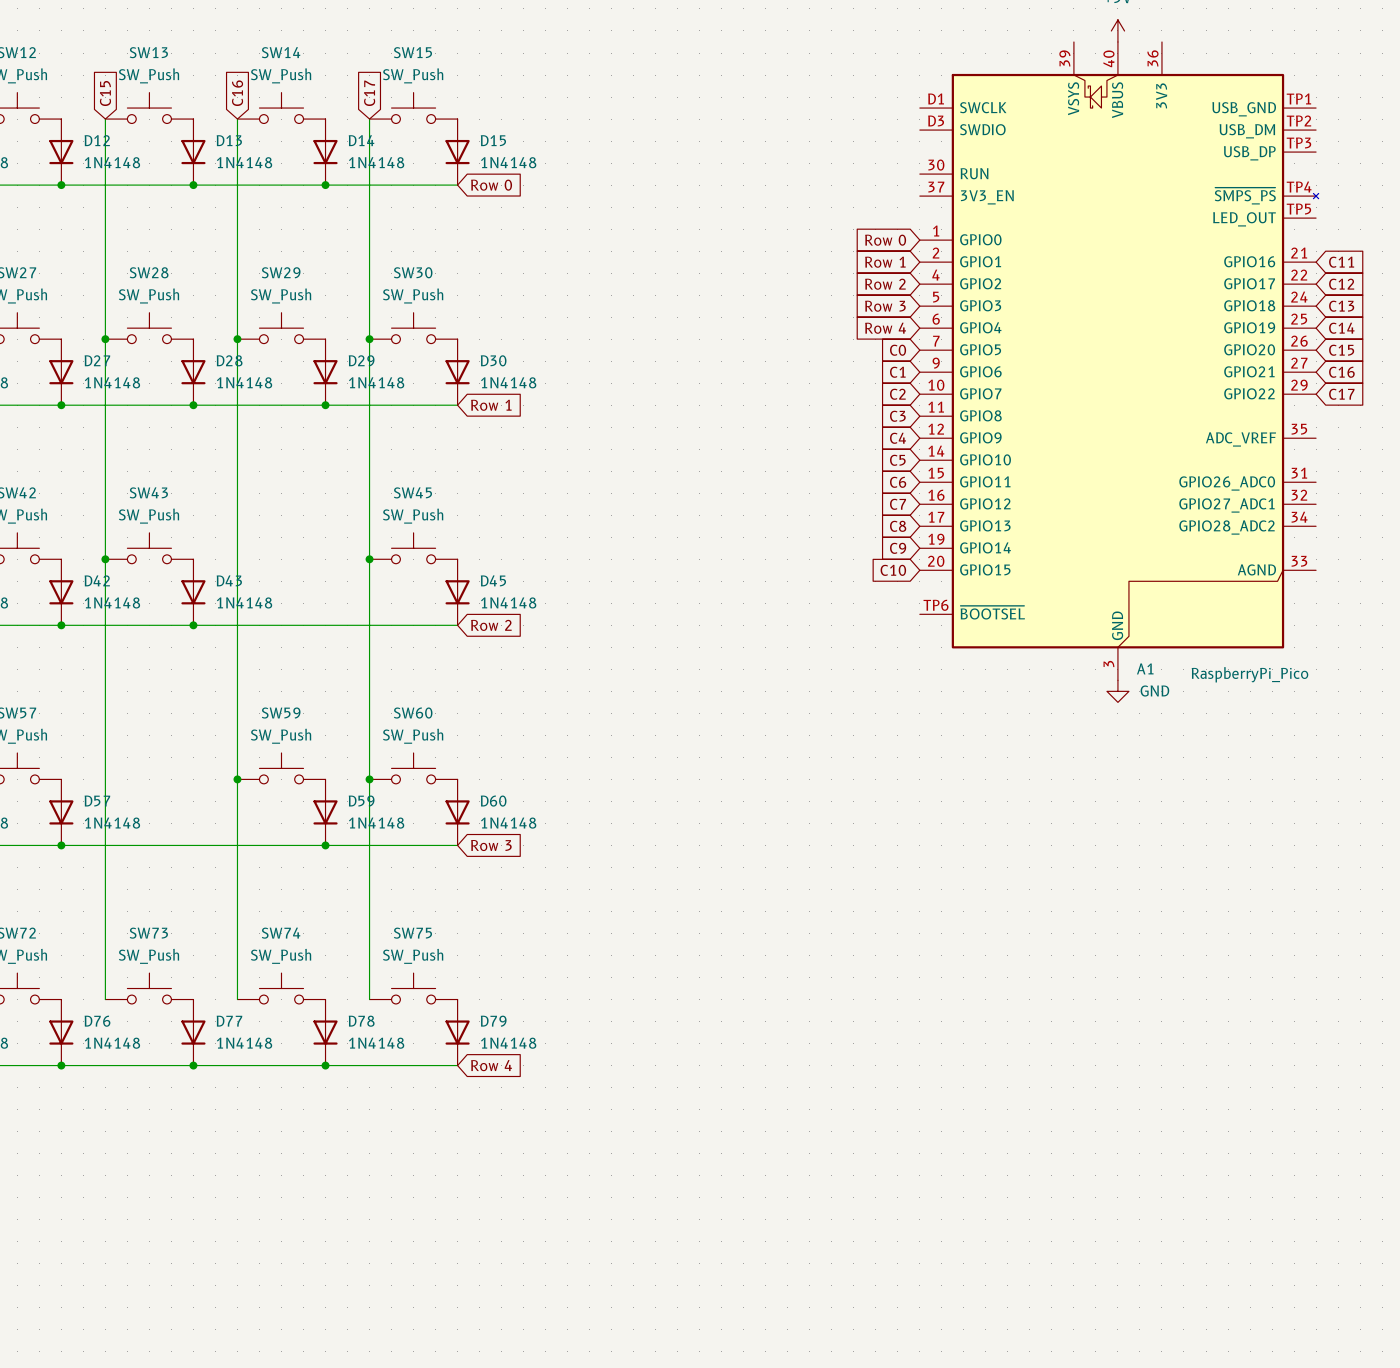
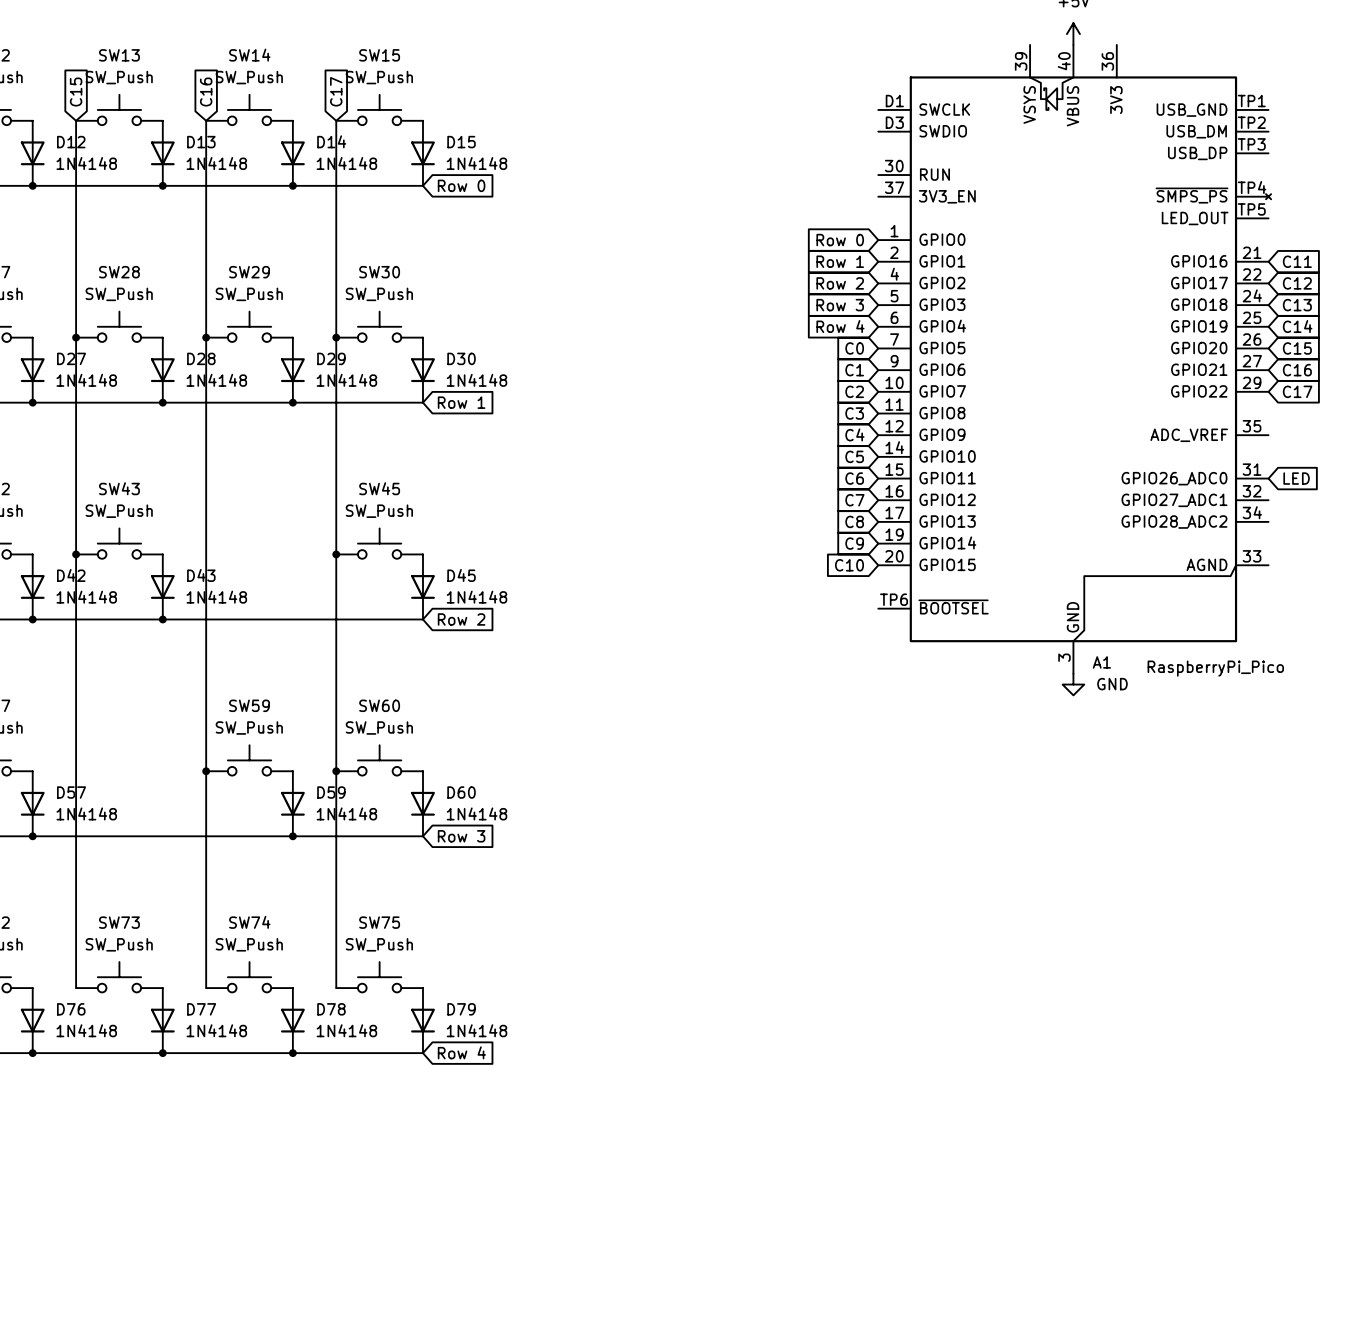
global label: none -> LED (1296, 478)

